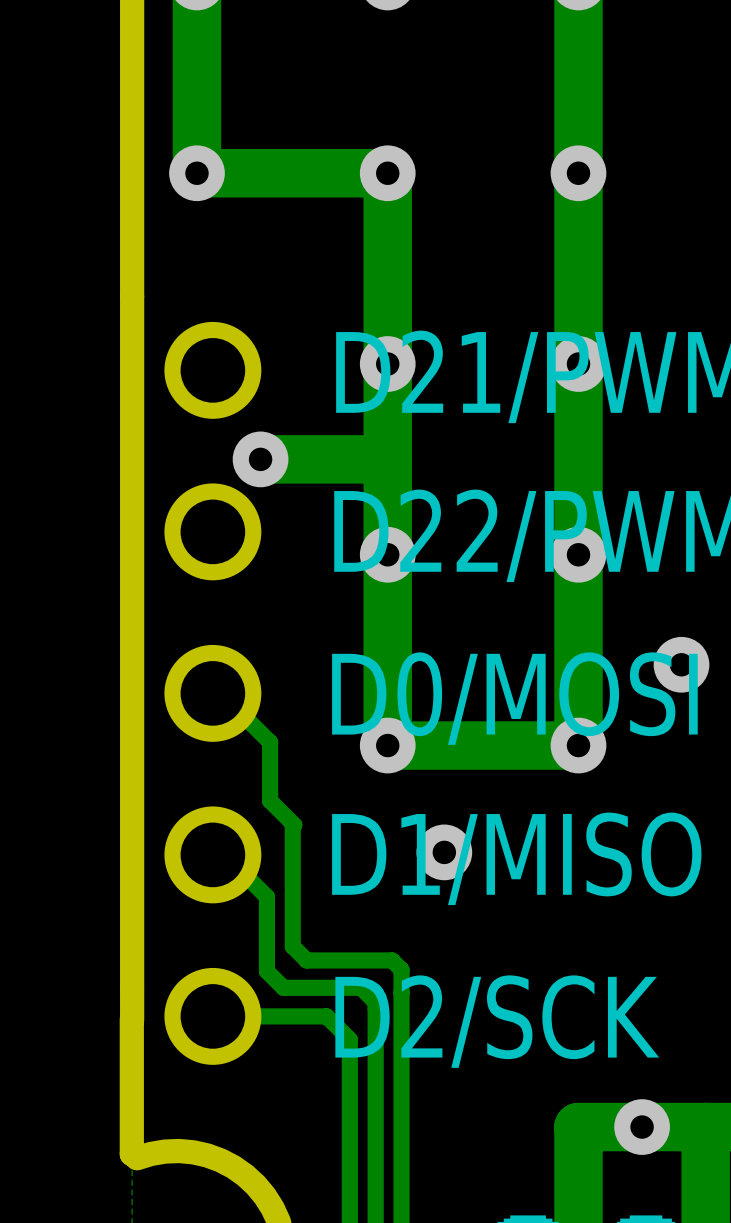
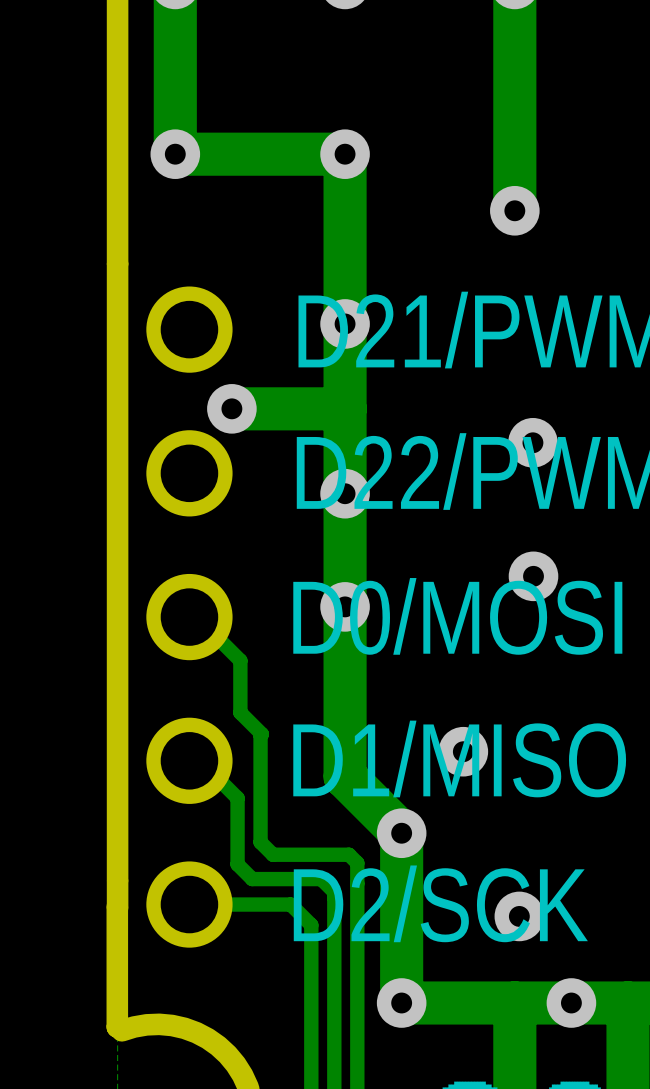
via: (578, 173) -> none
track: (578, 236) (578, 745) (387, 745) -> (514, 1003) (401, 1003) (401, 833) (345, 776) (345, 663)
via: none -> (514, 210)
via: (578, 364) -> none
via: none -> (532, 442)
via: (578, 554) -> none
via: none -> (533, 576)
via: (681, 664) -> none
via position: (387, 745) -> (345, 606)
via: (578, 745) -> none
via: none -> (463, 751)
via: (444, 852) -> none
via: none -> (401, 833)
via: none -> (519, 916)
via: none -> (401, 1003)

